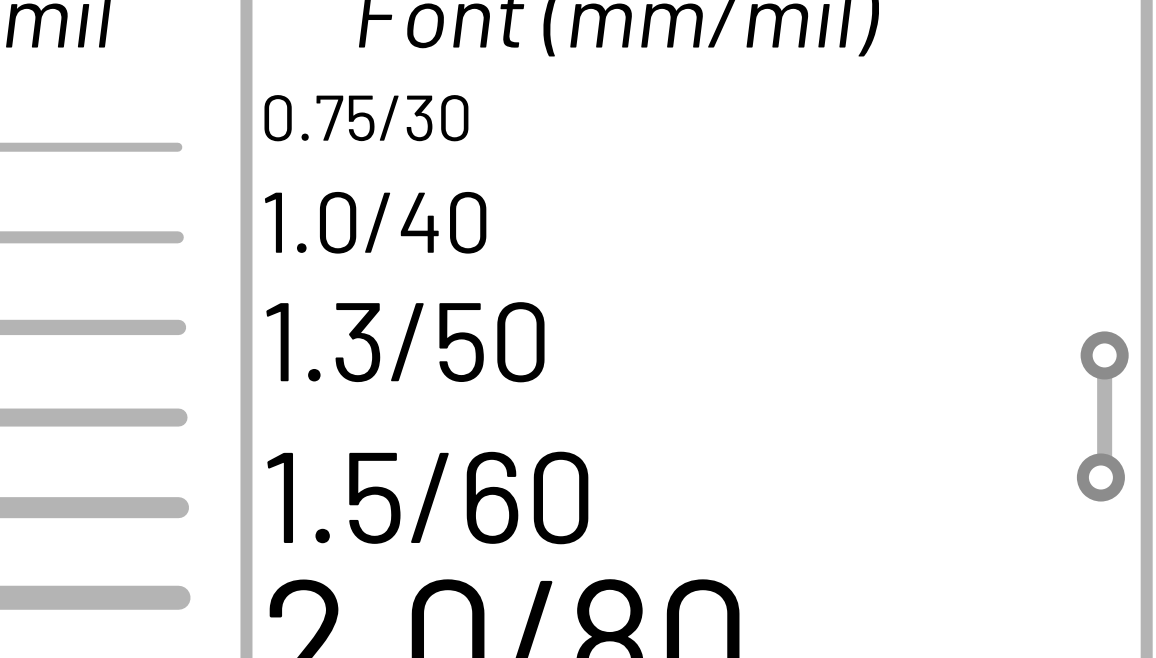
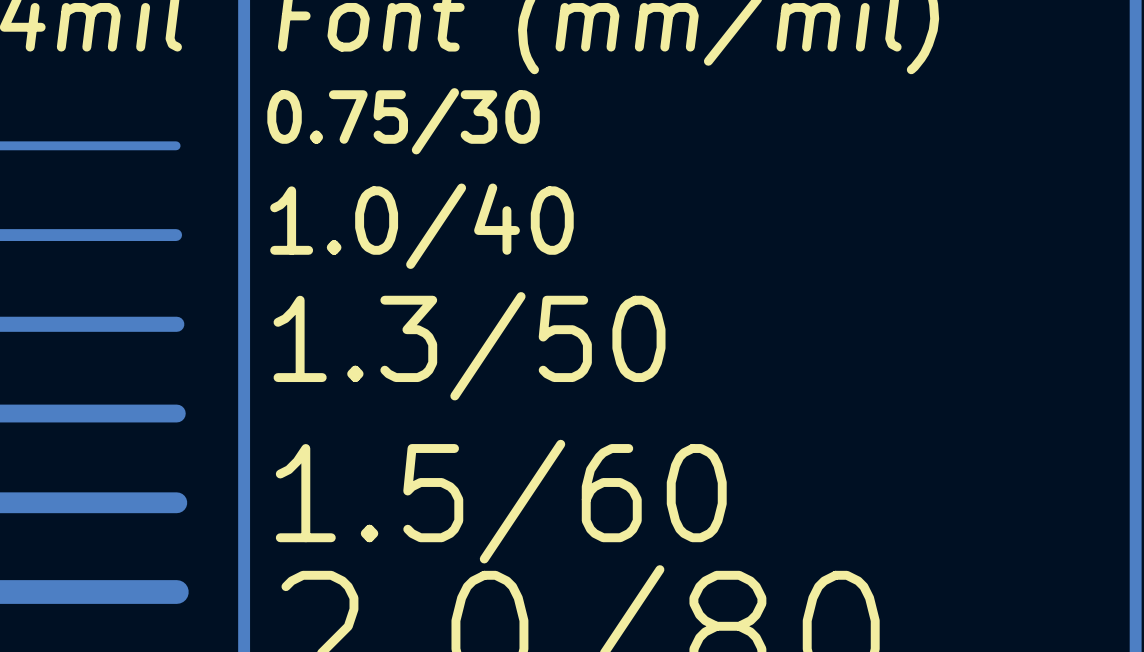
track: (1104, 355) (1104, 473) (1100, 477) -> none
via: (1104, 355) -> none
via: (1100, 477) -> none

